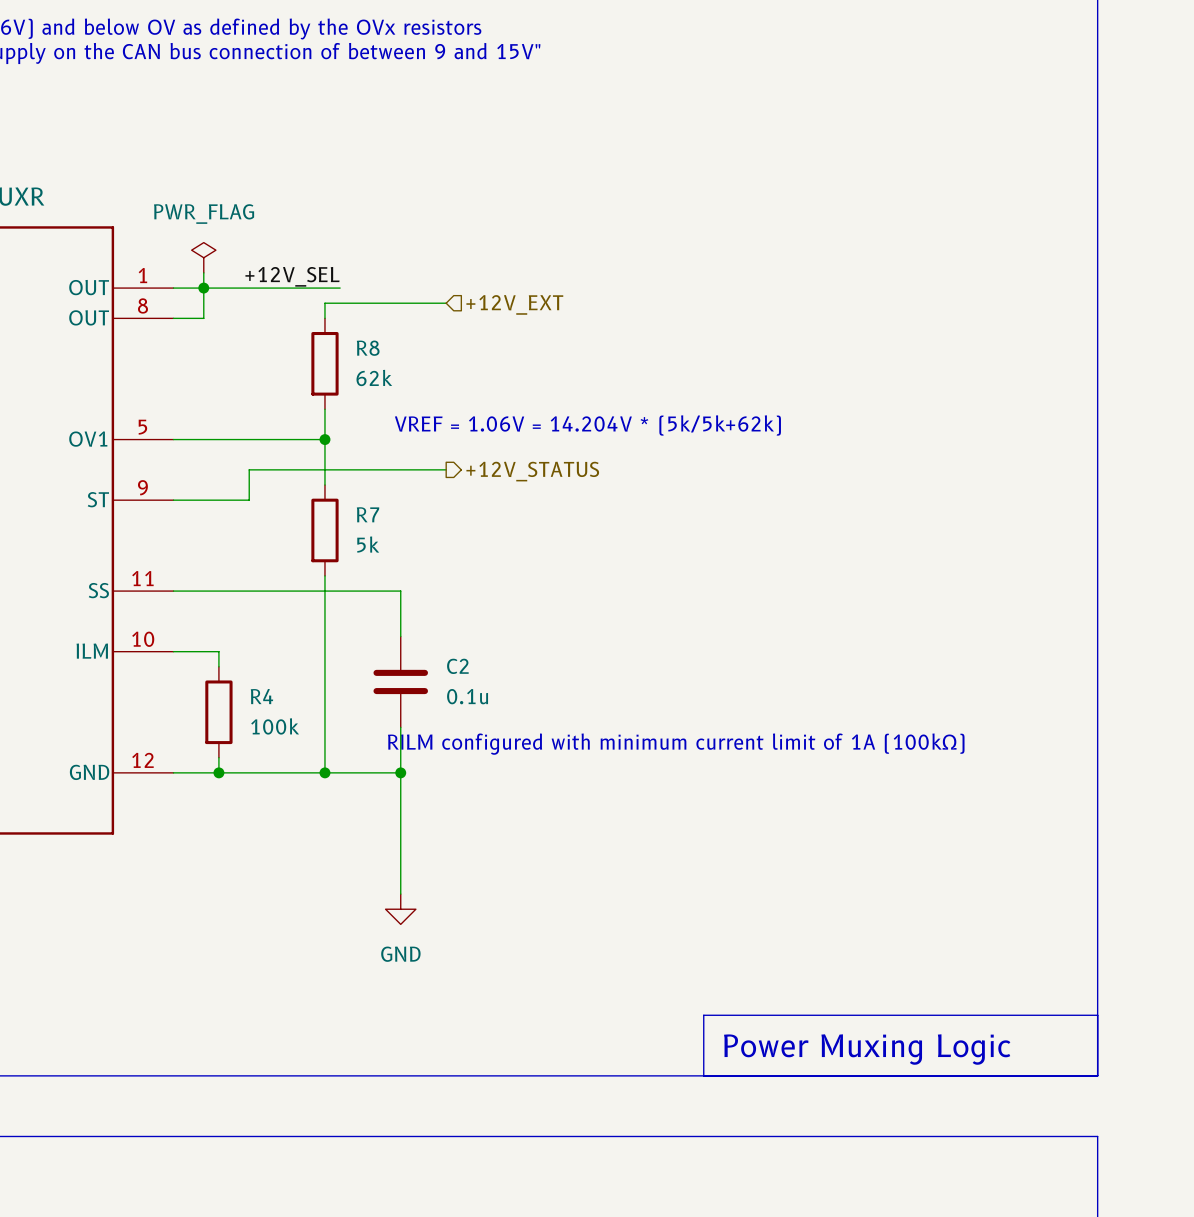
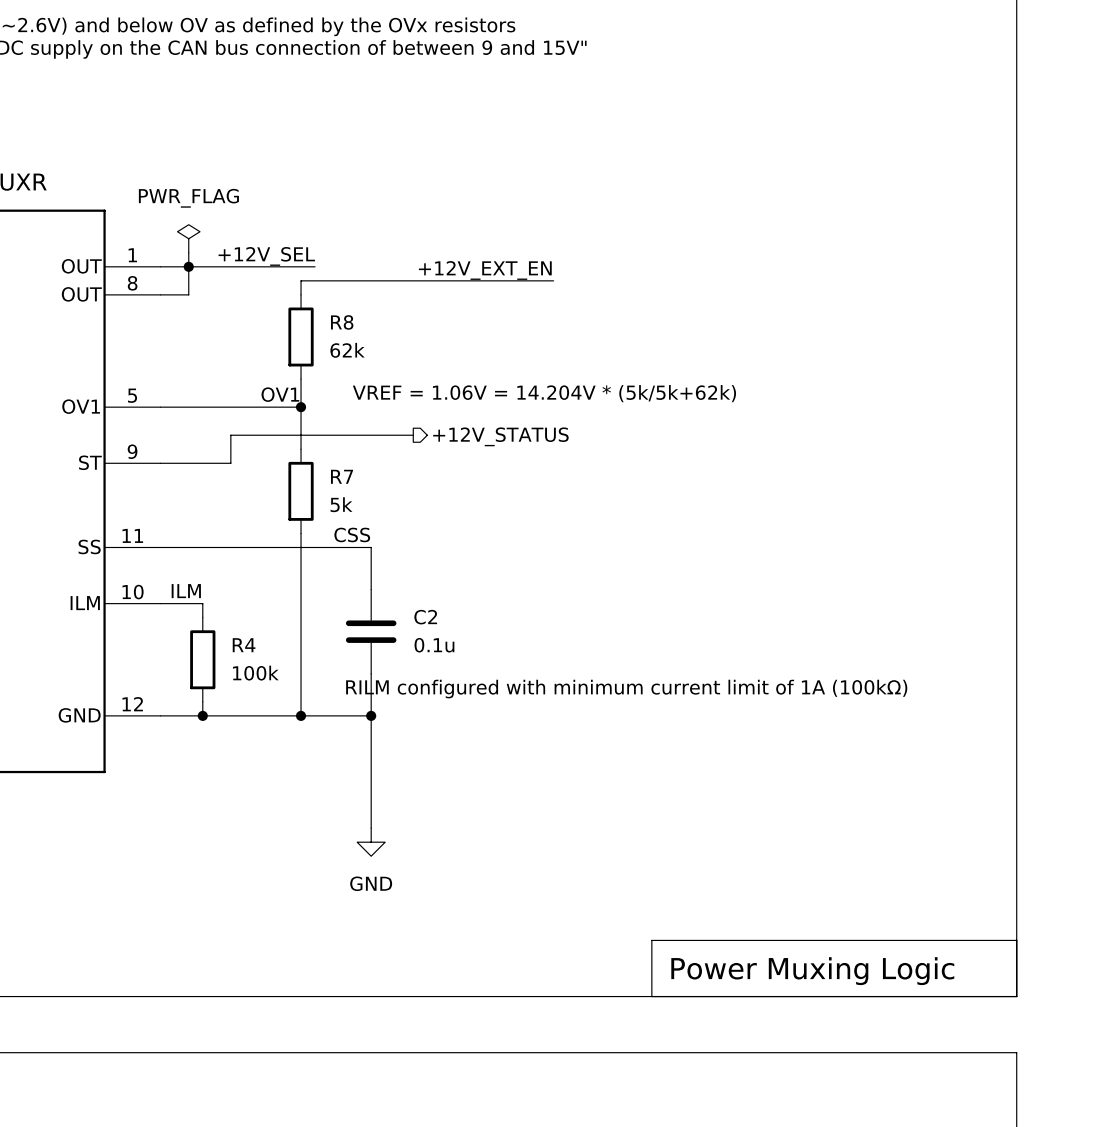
label: none -> +12V_EXT_EN (485, 270)
wire: none -> (413, 280) (553, 280)
hierarchical label: +12V_EXT (514, 304) -> none
label: none -> OV1 (280, 394)
label: none -> CSS (352, 534)
label: none -> ILM (186, 591)

